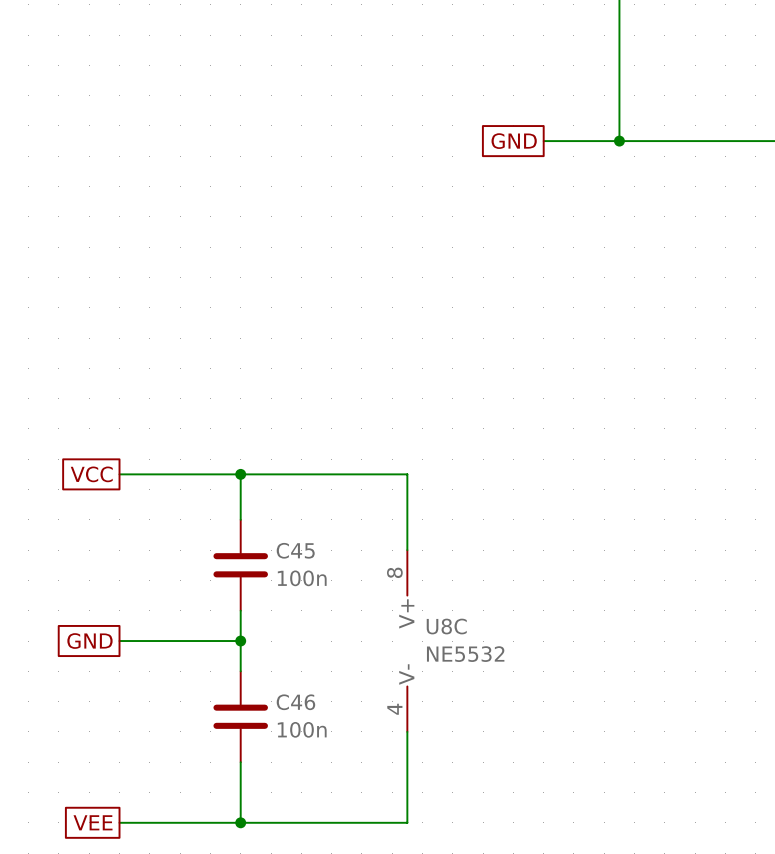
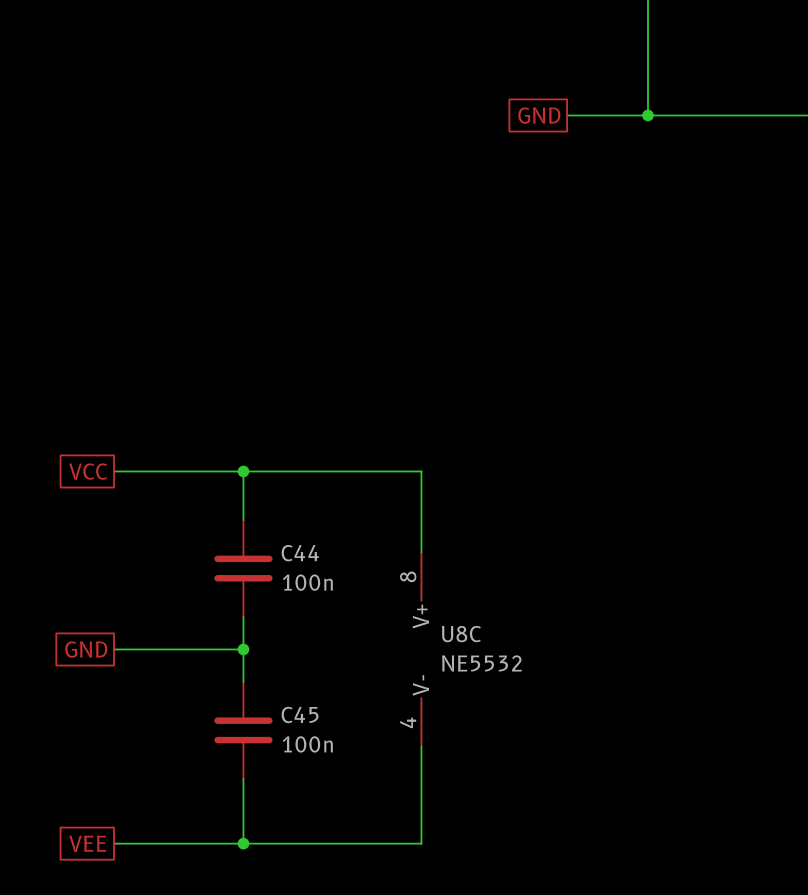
C45 name: C45 (295, 550) -> C44 (300, 553)
C46 name: C46 (295, 702) -> C45 (300, 714)

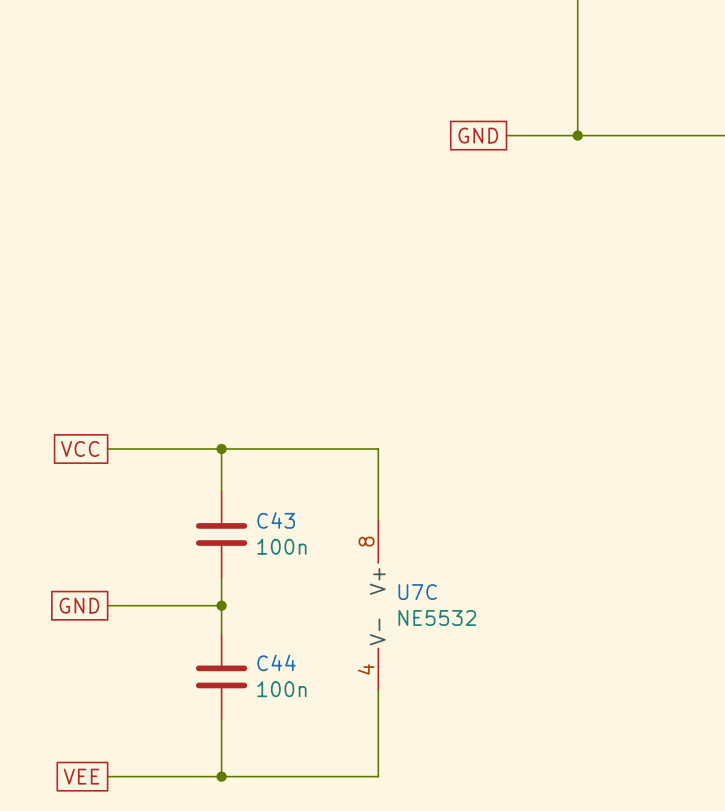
C44 name: C44 (300, 553) -> C43 (276, 520)
U8C name: U8C (461, 634) -> U7C (417, 592)
C45 name: C45 (300, 714) -> C44 (276, 662)

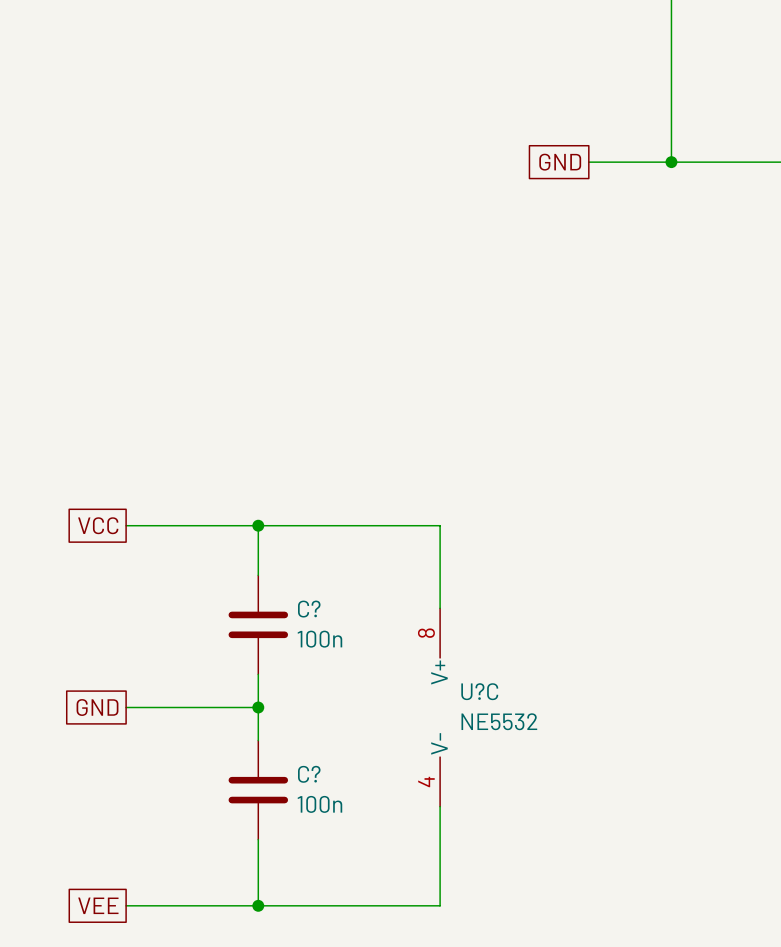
C43 name: C43 (276, 520) -> C? (309, 609)
U7C name: U7C (417, 592) -> U?C (479, 691)
C44 name: C44 (276, 662) -> C? (309, 774)

